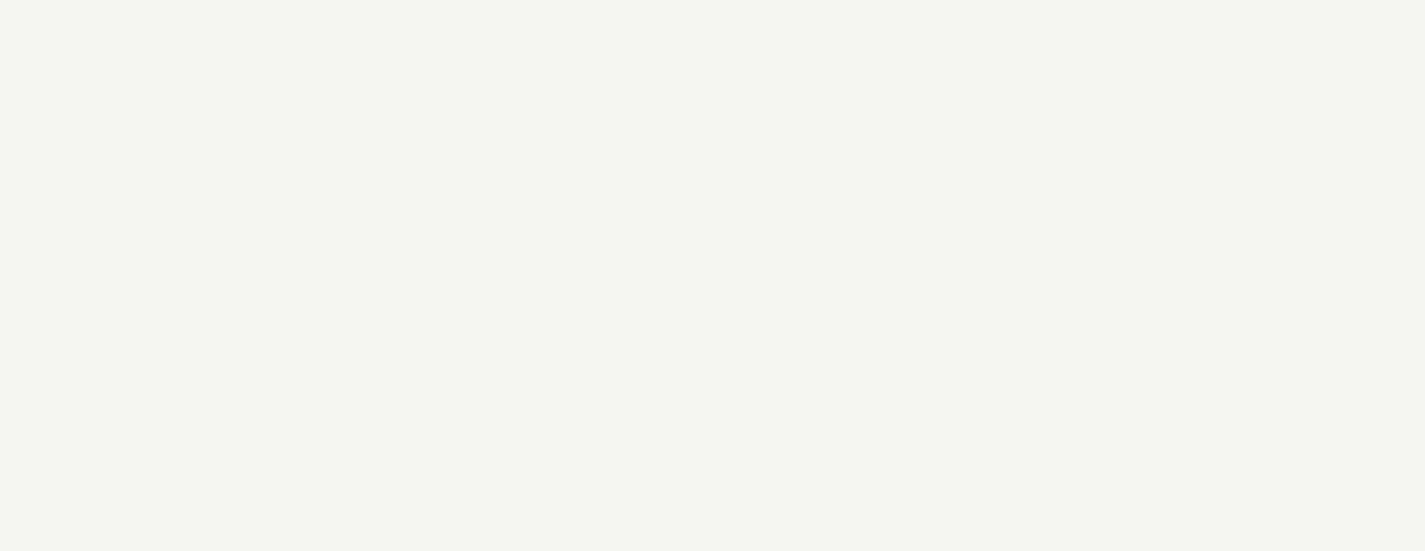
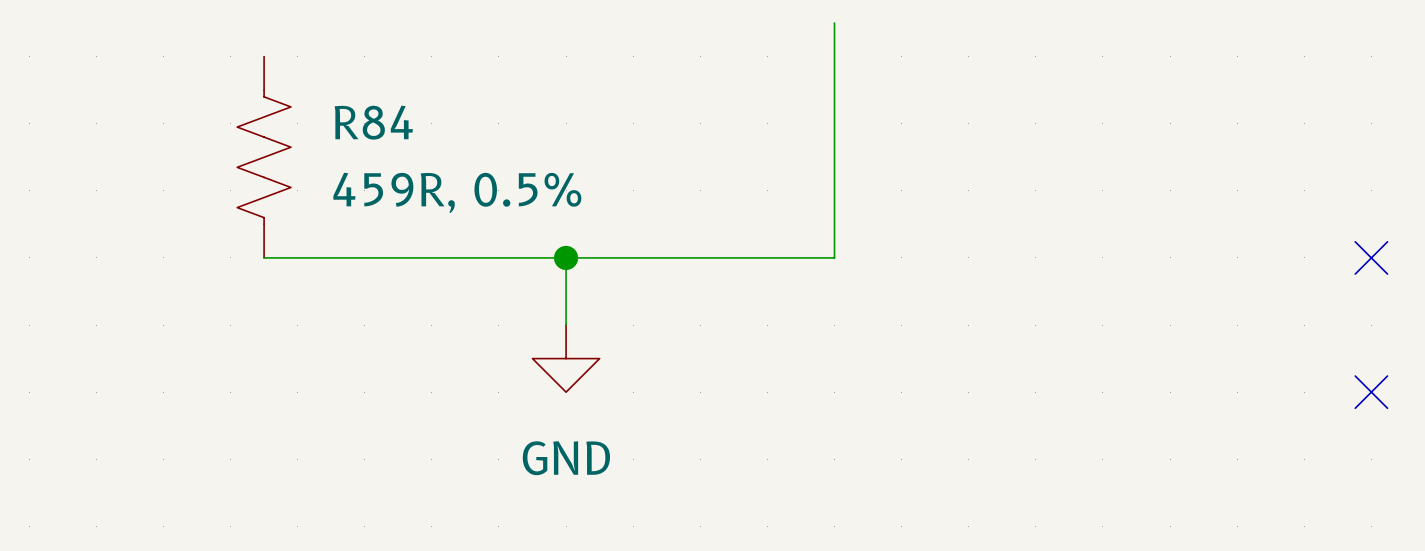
wire: none -> (834, 23) (834, 257) (264, 257)
R84: none -> 459R, 0.5% (264, 157)
wire: none -> (566, 257) (566, 325)
junction: none -> (566, 257)
no-connect mark: none -> (1371, 257)
power symbol: none -> GND (566, 358)
no-connect mark: none -> (1371, 392)

